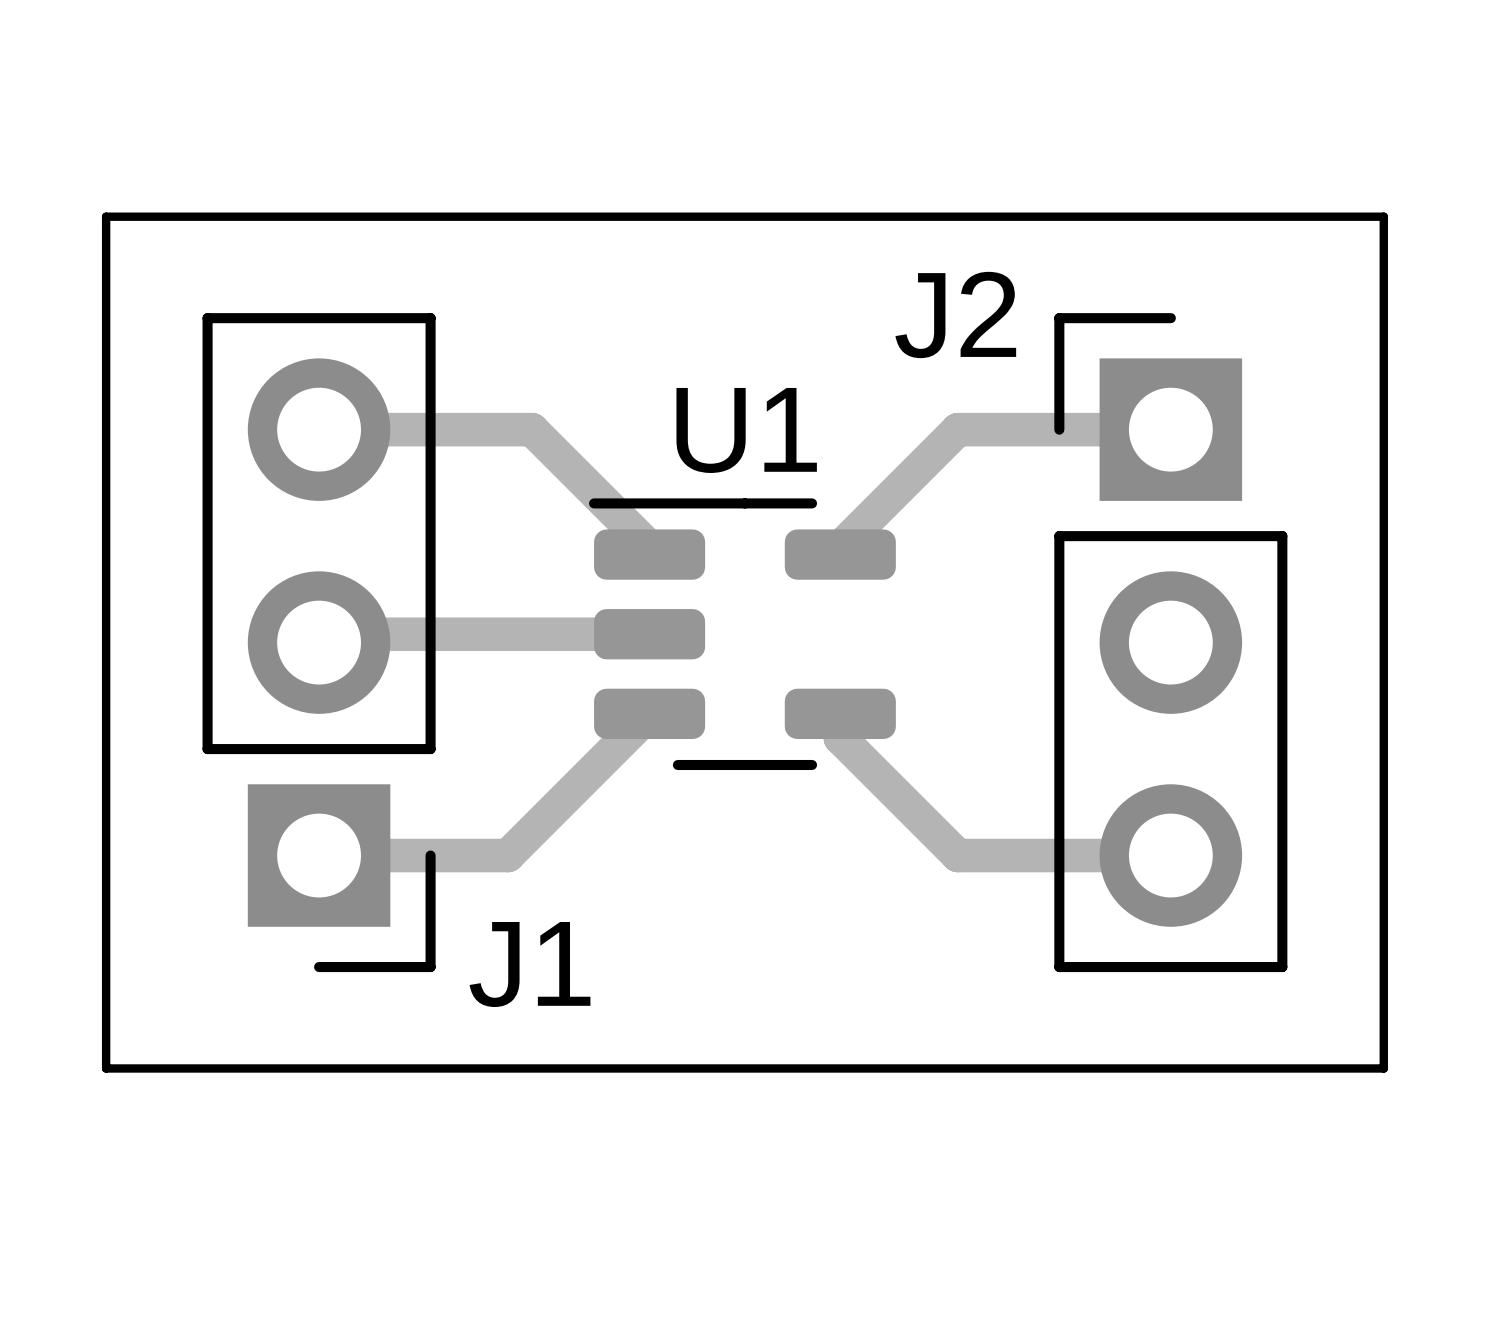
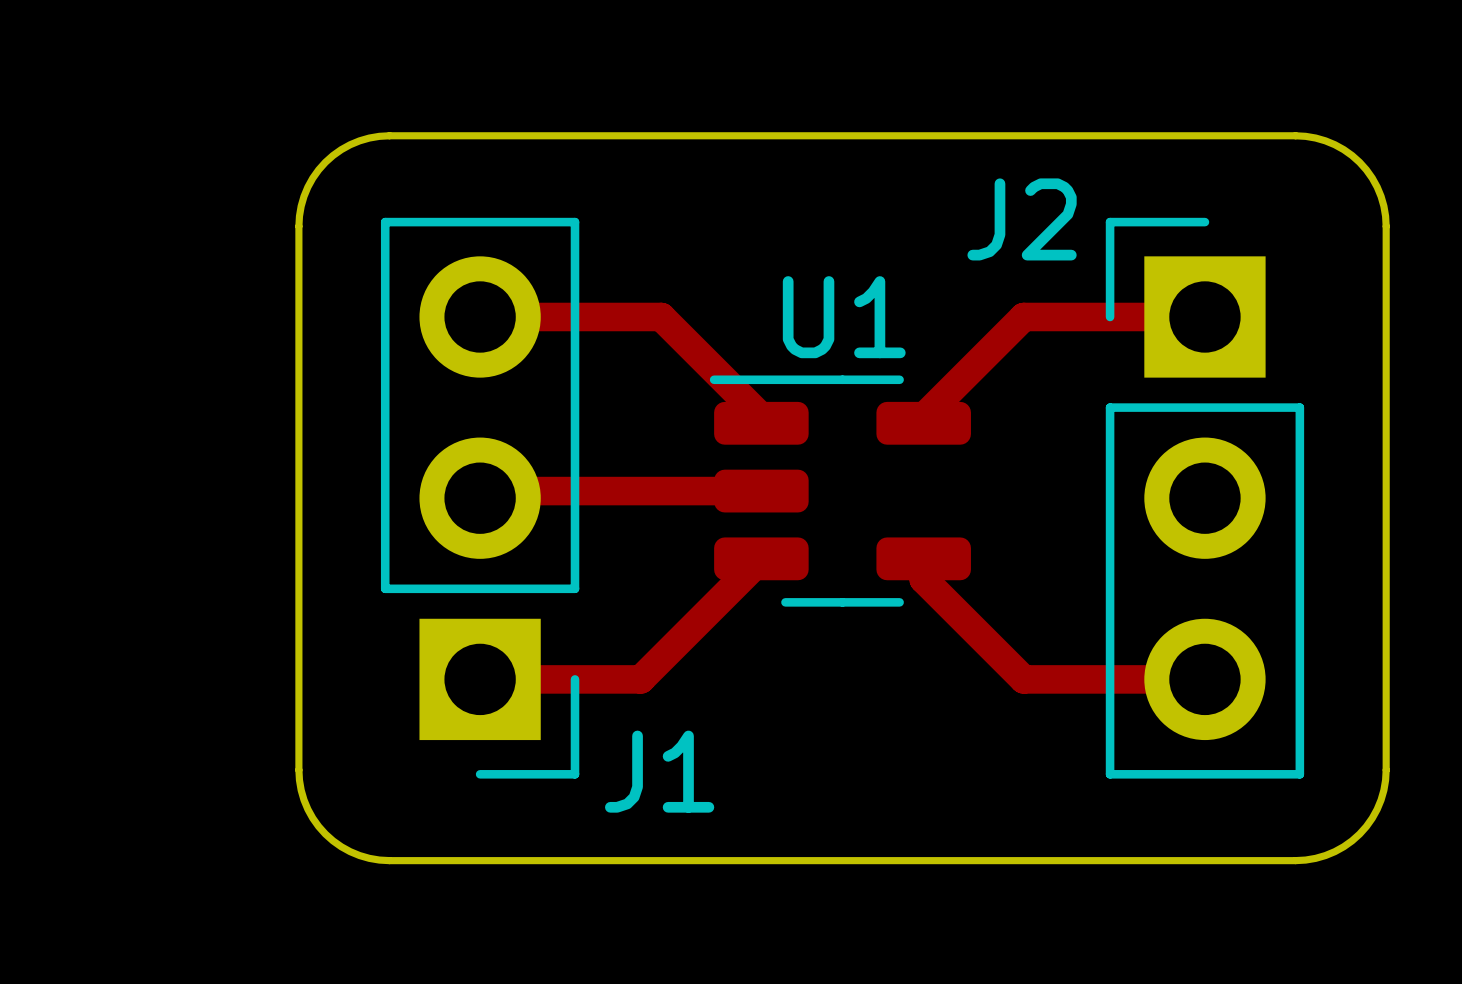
board edge: (212, 216) (106, 216) (106, 323) -> (389, 135) (369, 138) (350, 144) (325, 162) (307, 187) (301, 206) (298, 226)
board edge: (1277, 216) (1383, 216) (1383, 323) -> (1295, 135) (1315, 138) (1334, 144) (1359, 162) (1377, 187) (1383, 206) (1386, 226)
board edge: (106, 962) (106, 1068) (212, 1068) -> (298, 770) (301, 790) (307, 809) (325, 834) (350, 851) (369, 858) (389, 860)
board edge: (1383, 962) (1383, 1068) (1277, 1068) -> (1386, 770) (1383, 790) (1377, 809) (1359, 834) (1343, 846) (1325, 855) (1295, 860)

